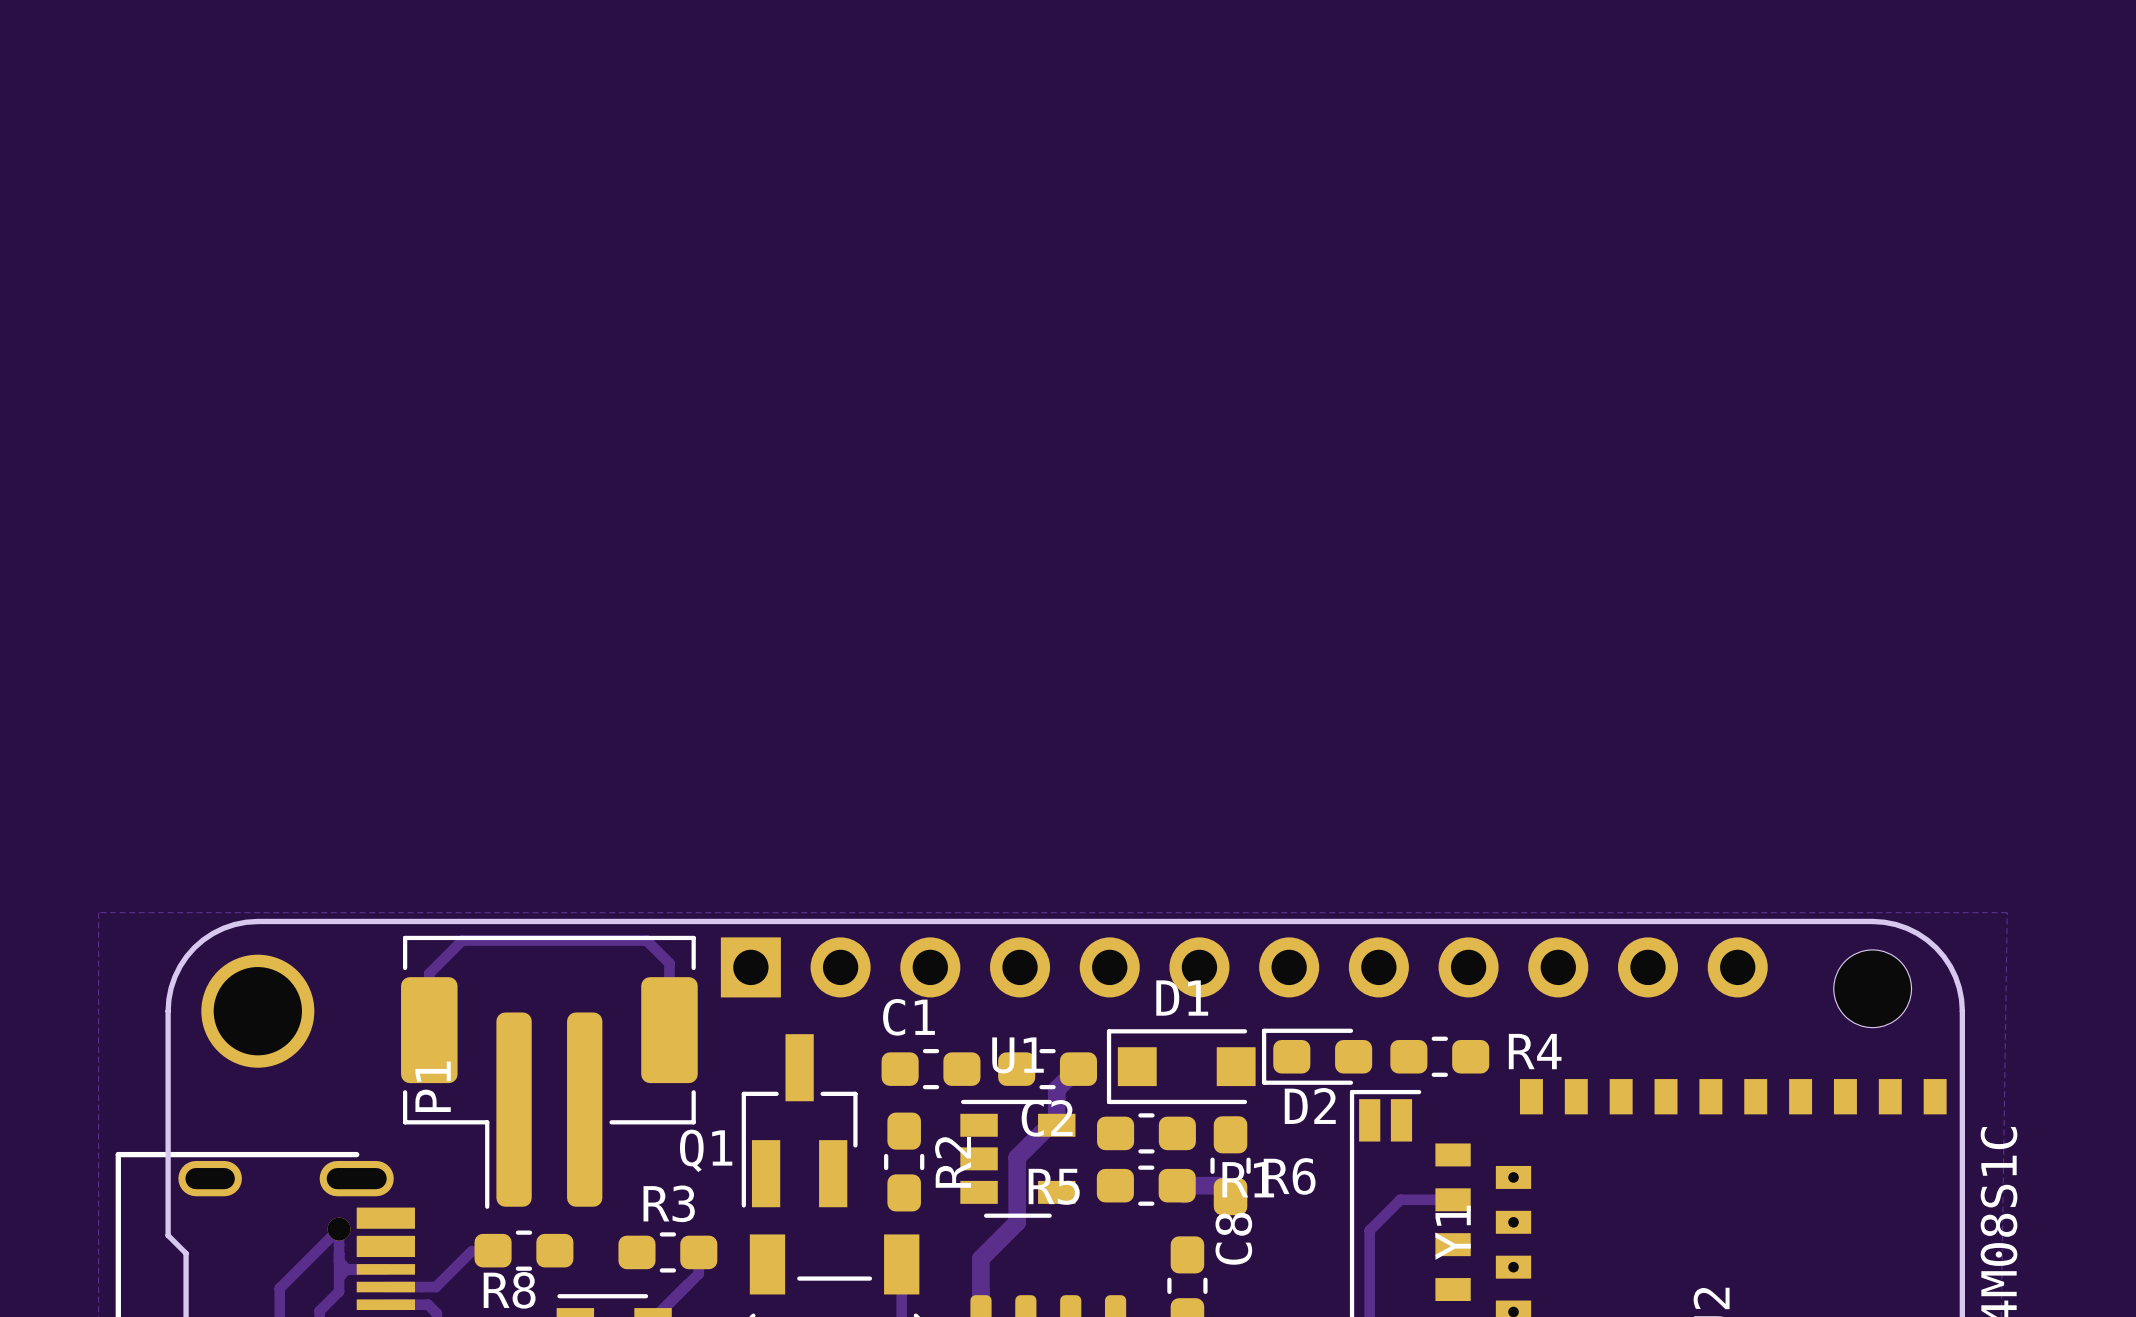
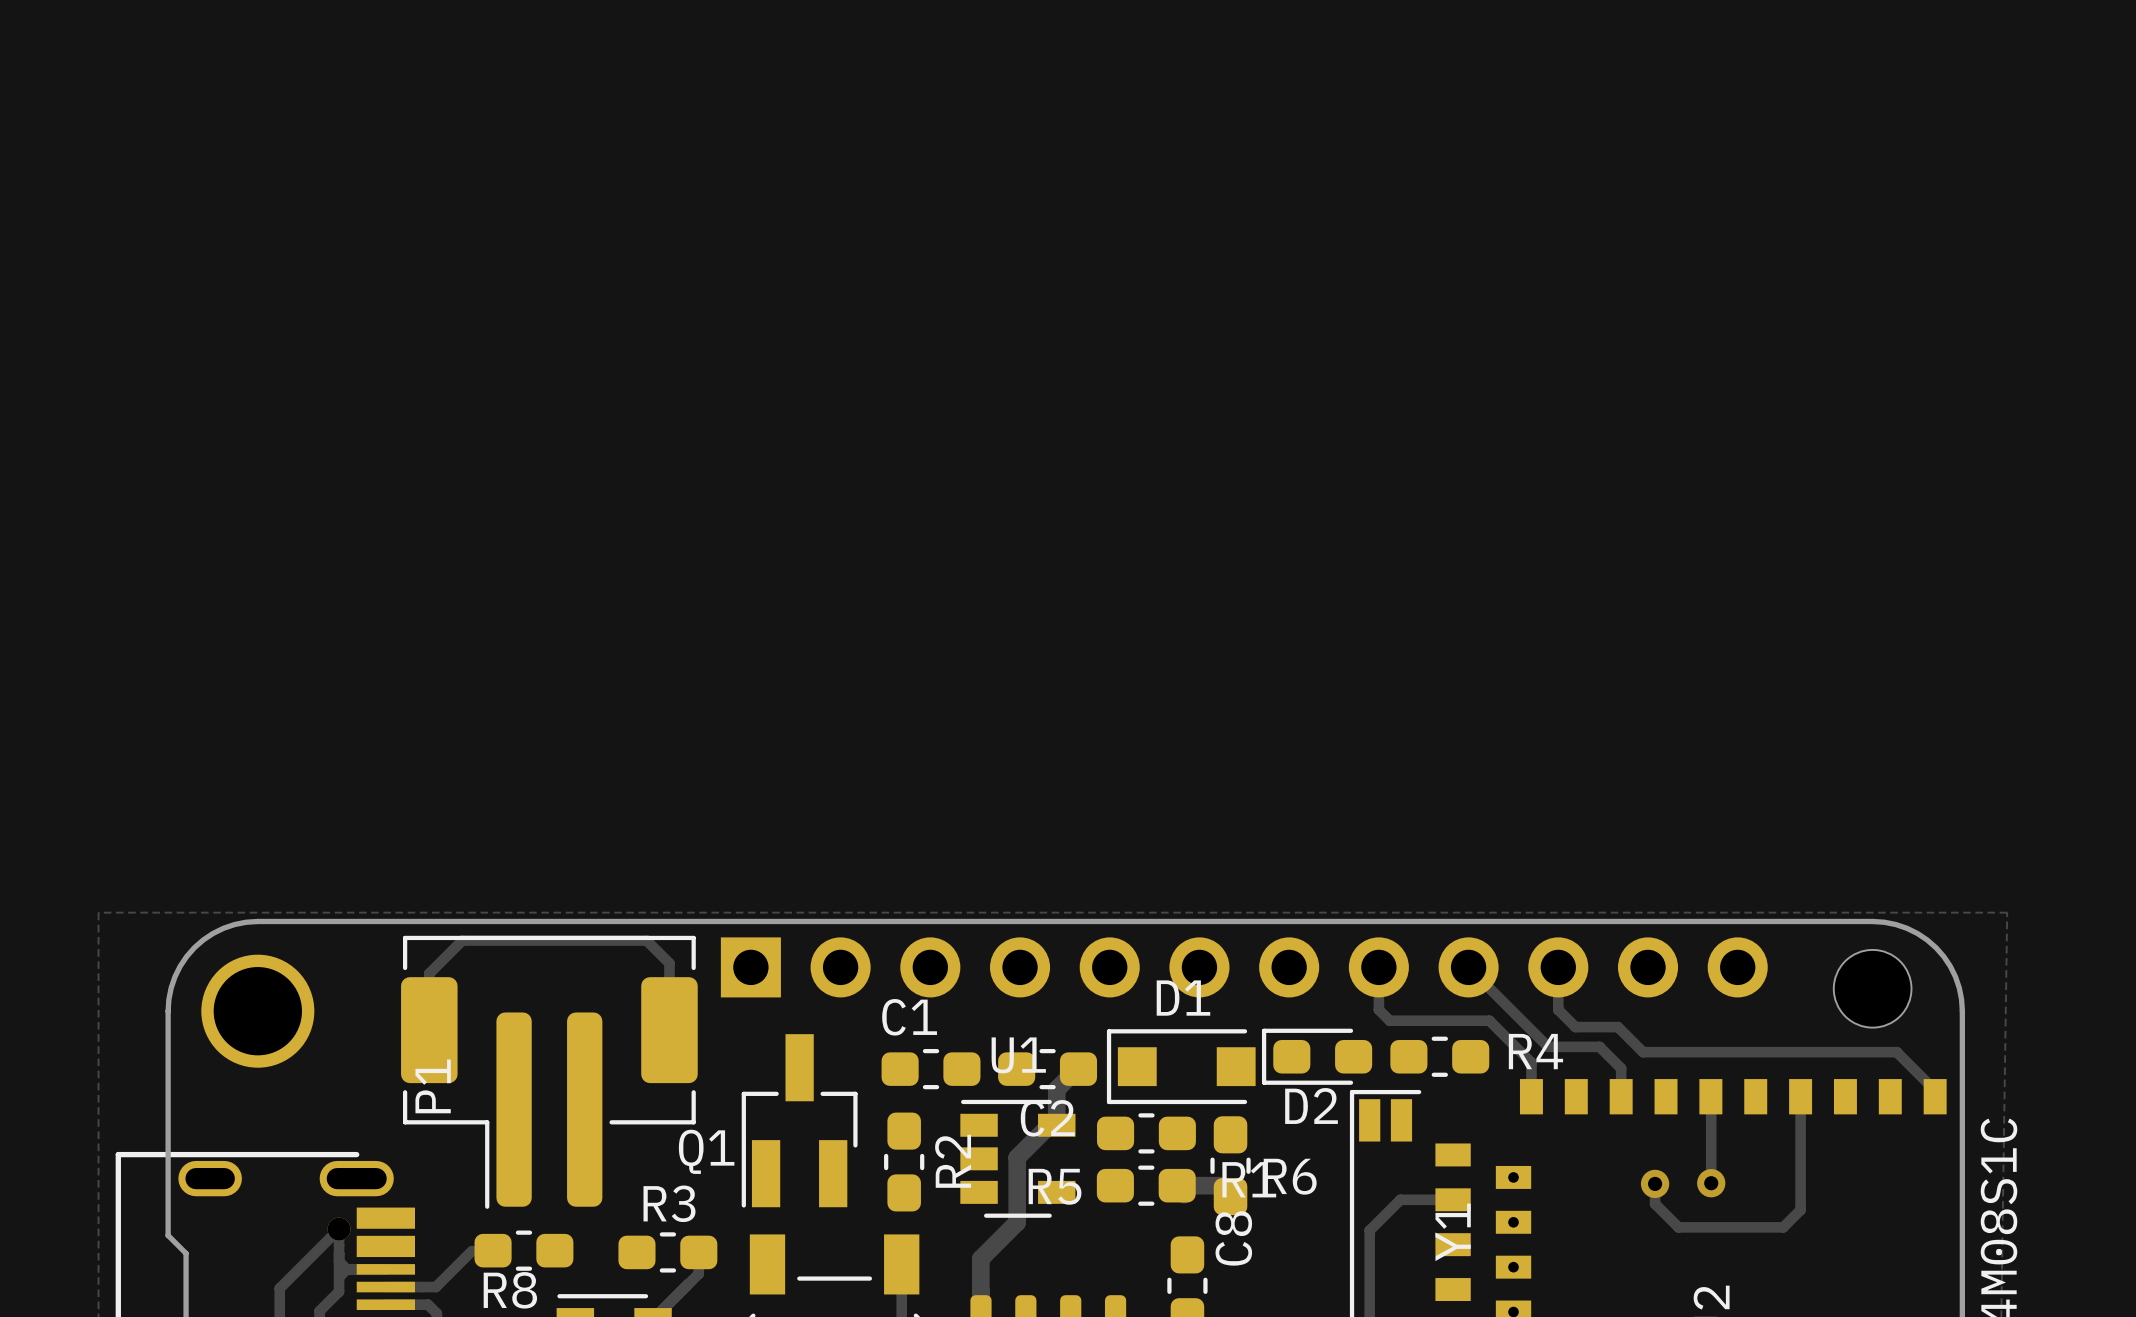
track: none -> (1378, 967) (1378, 1009) (1389, 1020) (1489, 1020) (1531, 1062) (1531, 1096)
track: none -> (1468, 967) (1548, 1046) (1599, 1046) (1621, 1068) (1621, 1096)
track: none -> (1558, 967) (1558, 1009) (1575, 1027) (1617, 1027) (1643, 1052) (1896, 1052) (1935, 1090) (1935, 1096)
track: none -> (1800, 1096) (1800, 1210) (1783, 1227) (1678, 1227) (1655, 1203) (1655, 1183)
track: none -> (1711, 1097) (1711, 1183)
via: none -> (1655, 1183)
via: none -> (1711, 1183)

